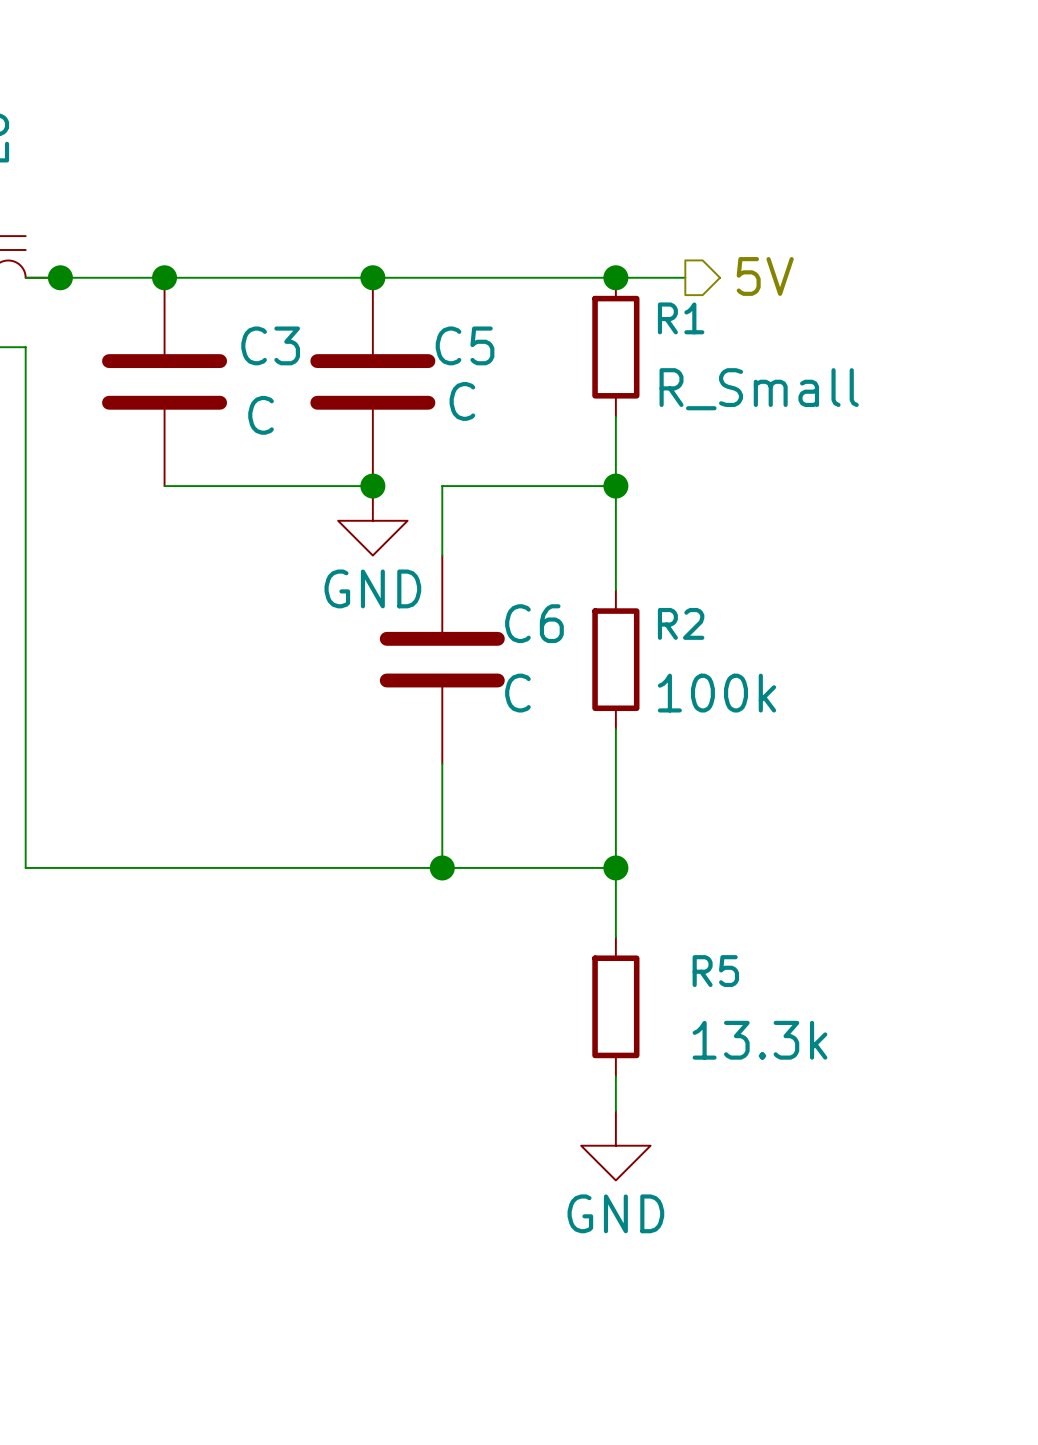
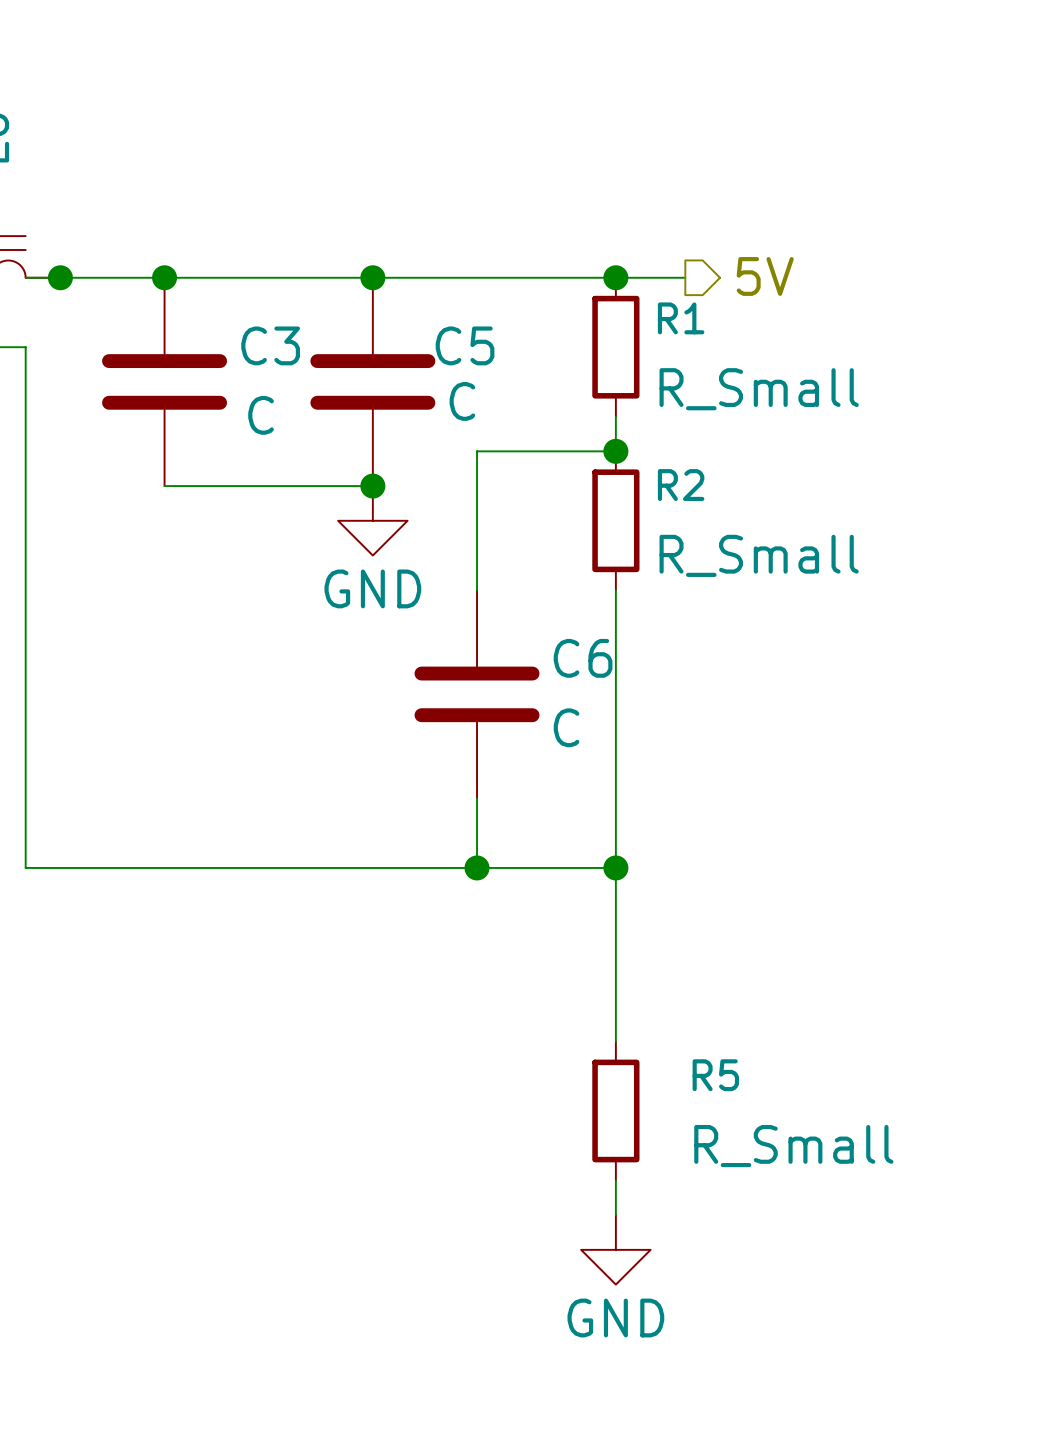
wire: (615, 451) (615, 590) -> (615, 451) (477, 451) (477, 590)
wire: (615, 486) (442, 486) (442, 555) -> none
junction position: (615, 486) -> (615, 451)
wire: none -> (615, 590) (615, 729)
C6 name position: C6 (534, 623) -> C6 (583, 658)
C6 position: (442, 659) -> (477, 694)
R2 position: (615, 659) -> (615, 520)
C6 value position: C (517, 693) -> C (566, 727)
R2 value: 100k (716, 693) -> R_Small (759, 555)
wire: (442, 763) (442, 867) -> (615, 937) (615, 1041)
wire: none -> (477, 798) (477, 867)
junction position: (442, 867) -> (477, 867)
R5 position: (615, 1006) -> (615, 1110)
R5 value: 13.3k (759, 1040) -> R_Small (793, 1146)
wire: (615, 1076) (615, 1110) -> (615, 1180) (615, 1215)
power symbol position: GND (615, 1145) -> GND (615, 1249)

